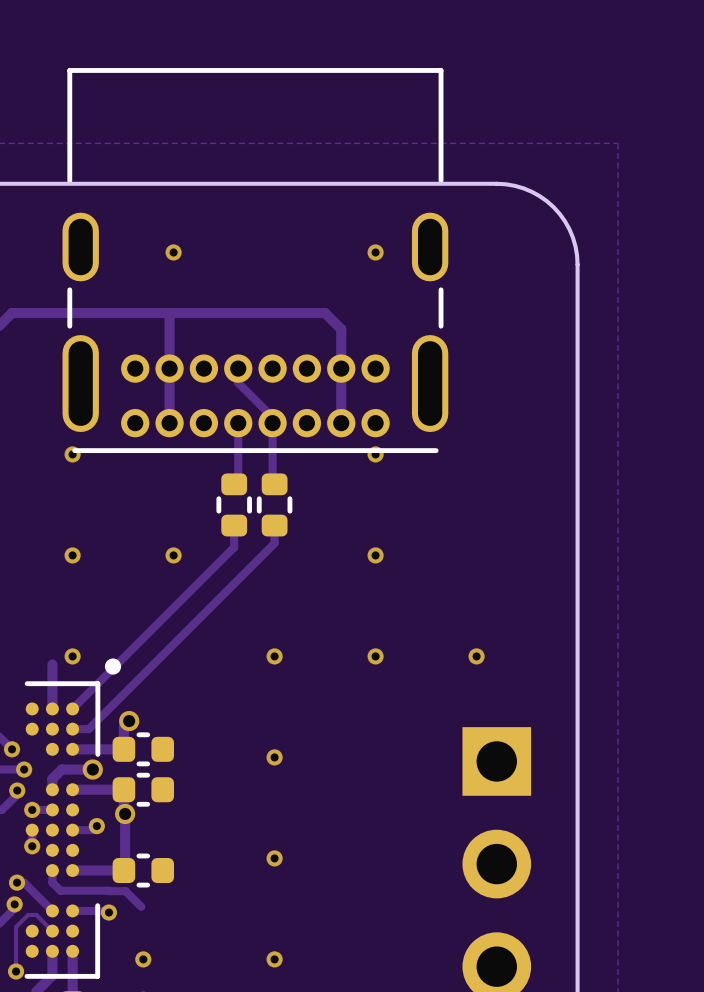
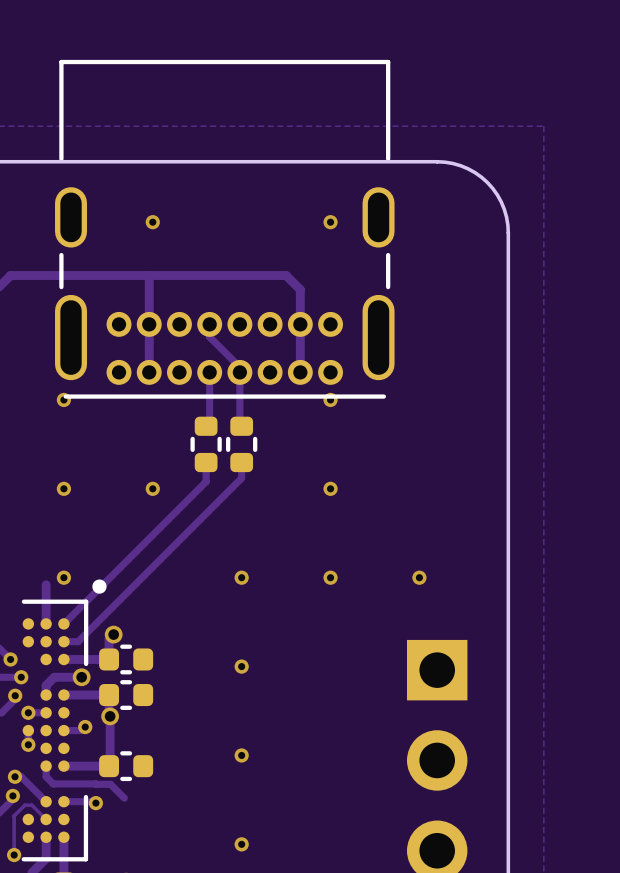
via: (143, 959) -> none

